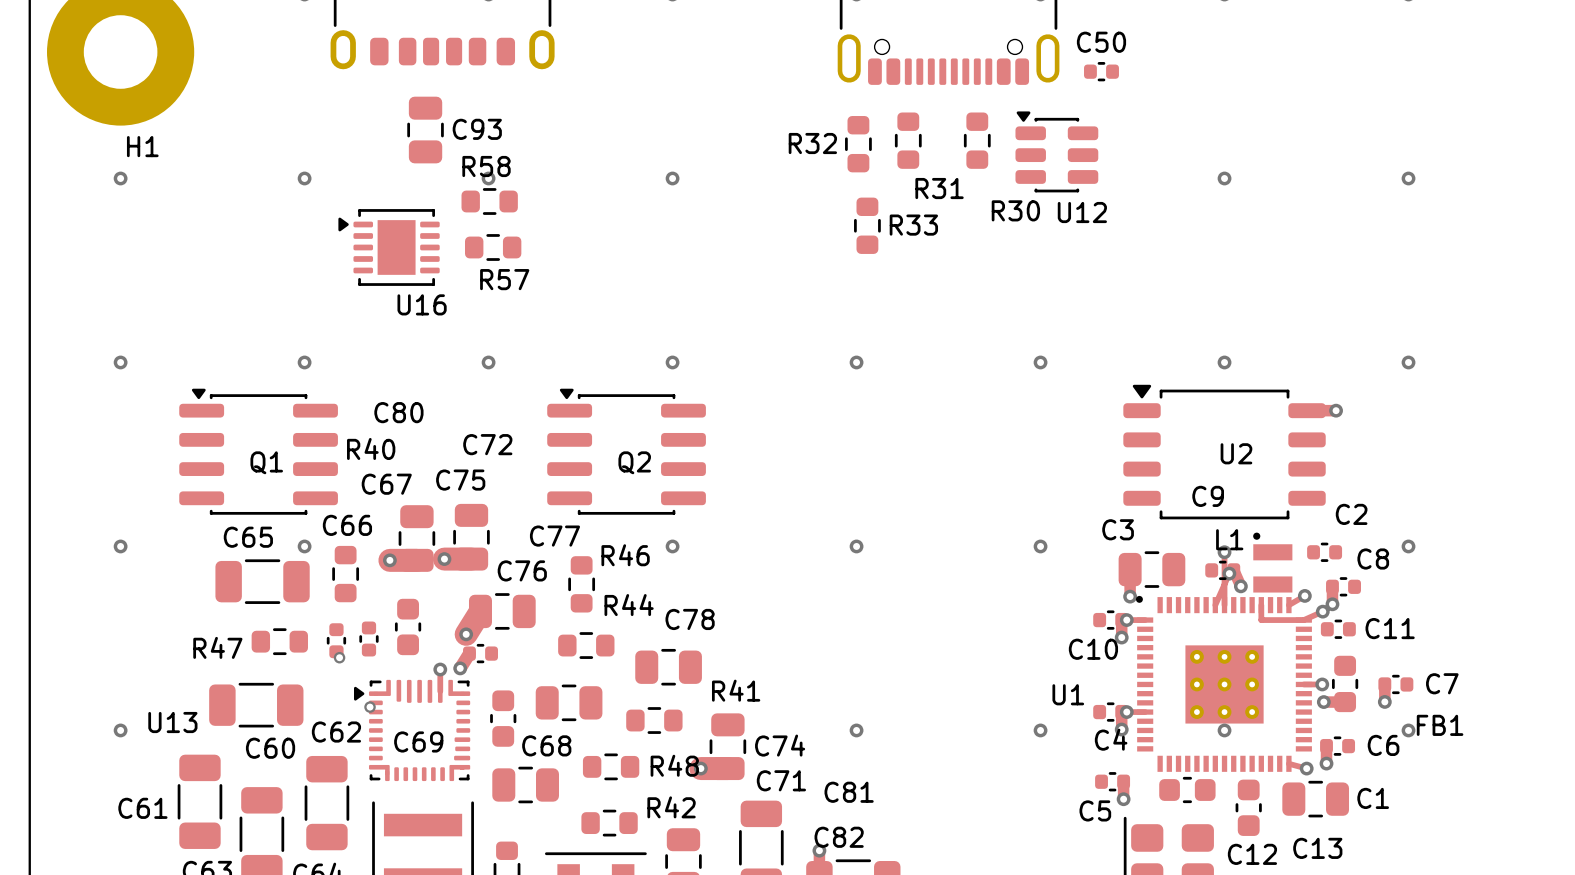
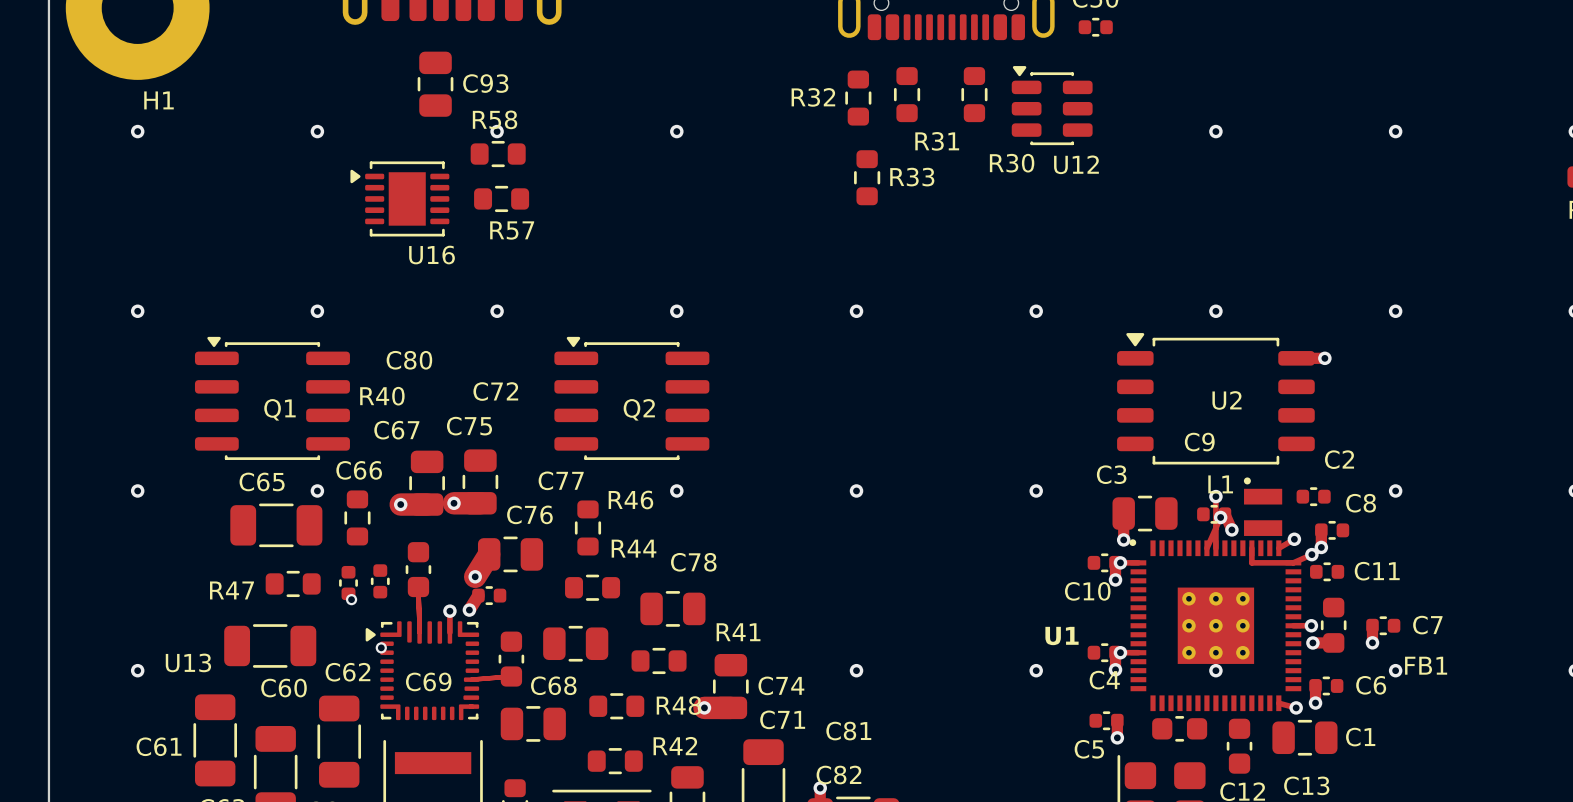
track: none -> (418, 587) (419, 632)
track: none -> (511, 676) (471, 679)

